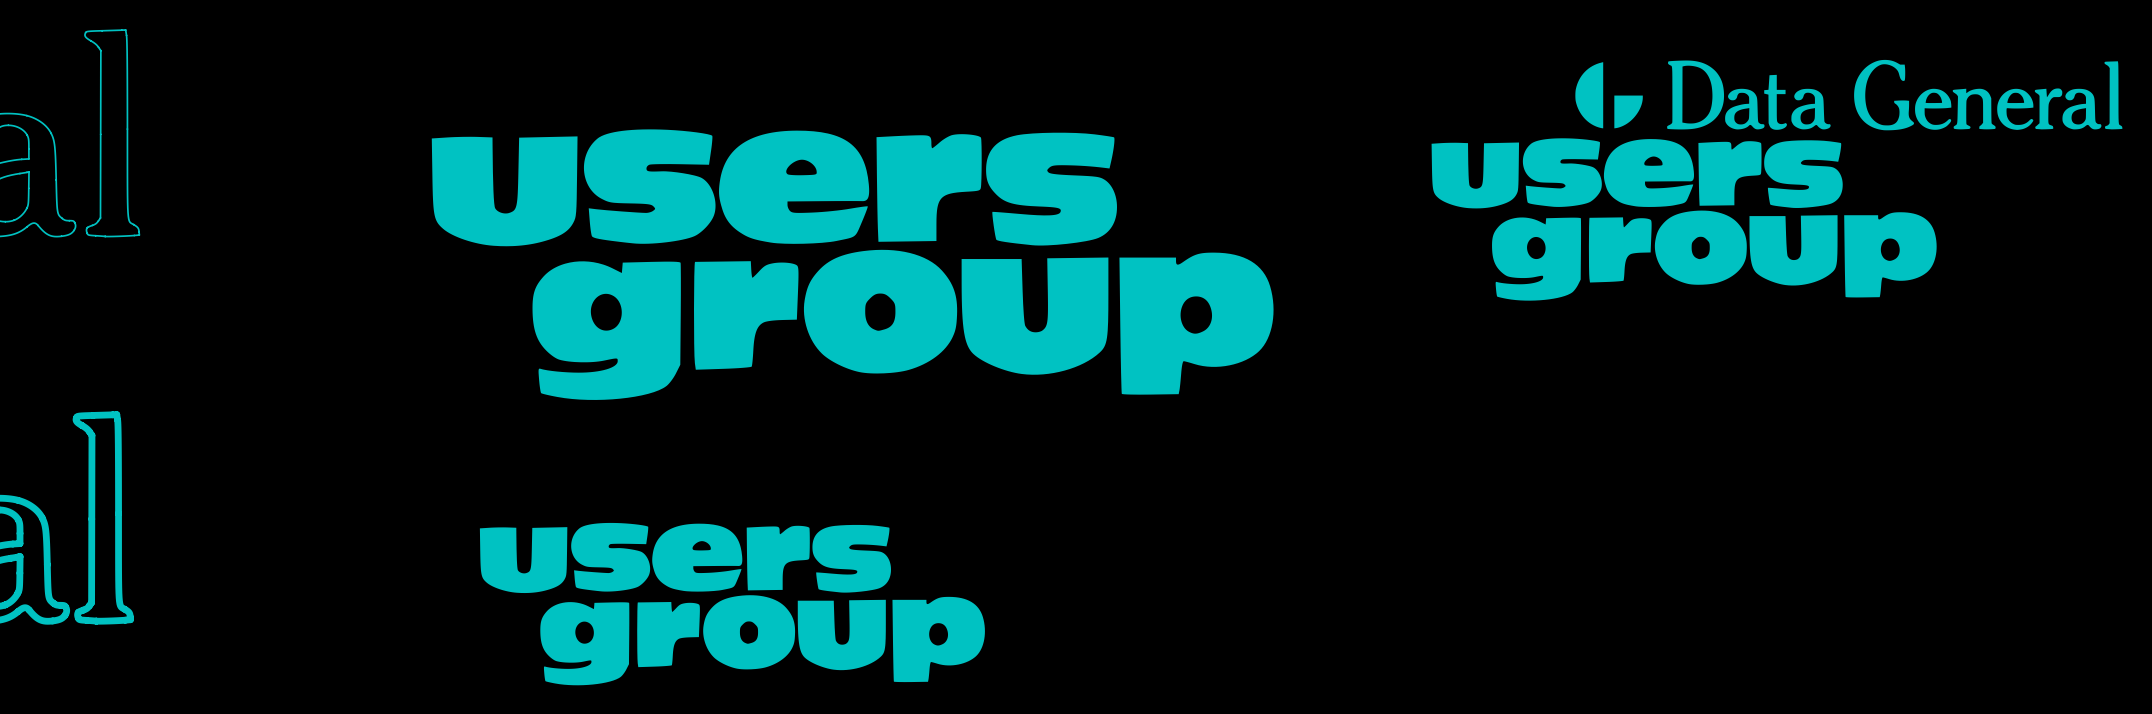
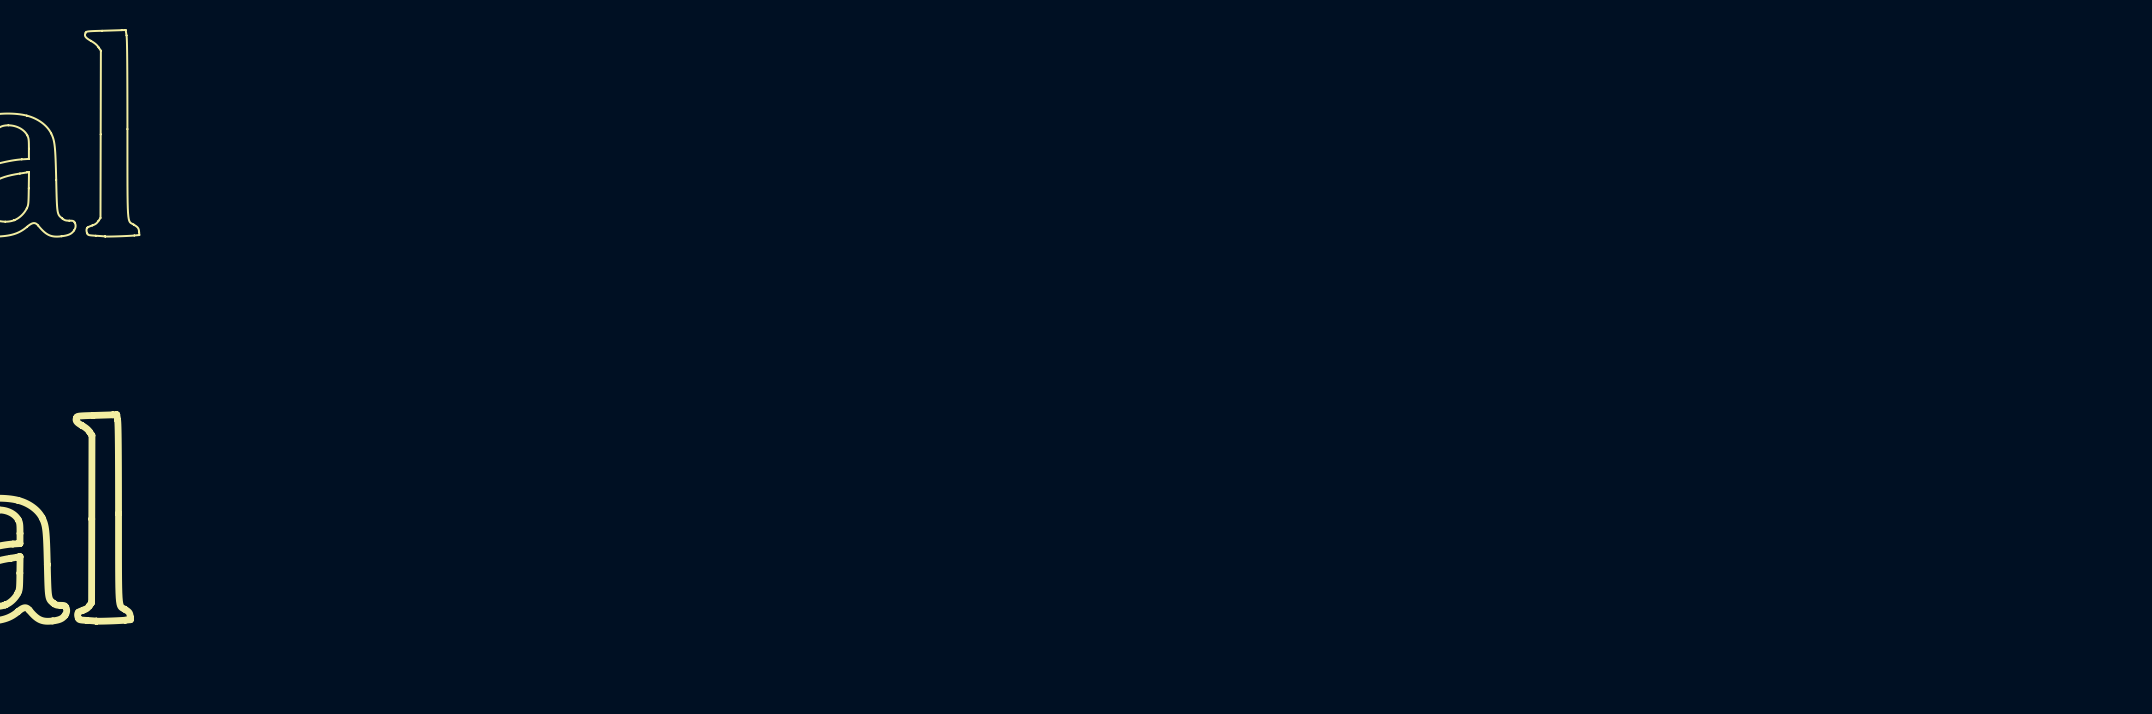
drawing: [1431, 59, 2123, 301] -> none
drawing: [431, 129, 1274, 400] -> none
drawing: [479, 522, 985, 686] -> none

